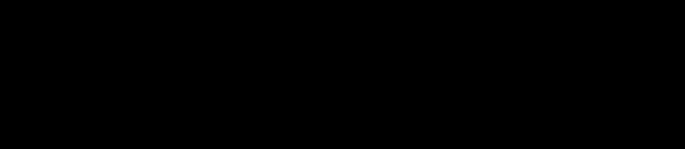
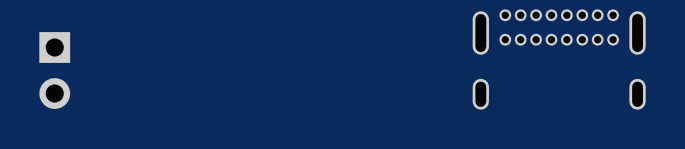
part: none -> (559, 59)
part: none -> (54, 70)

